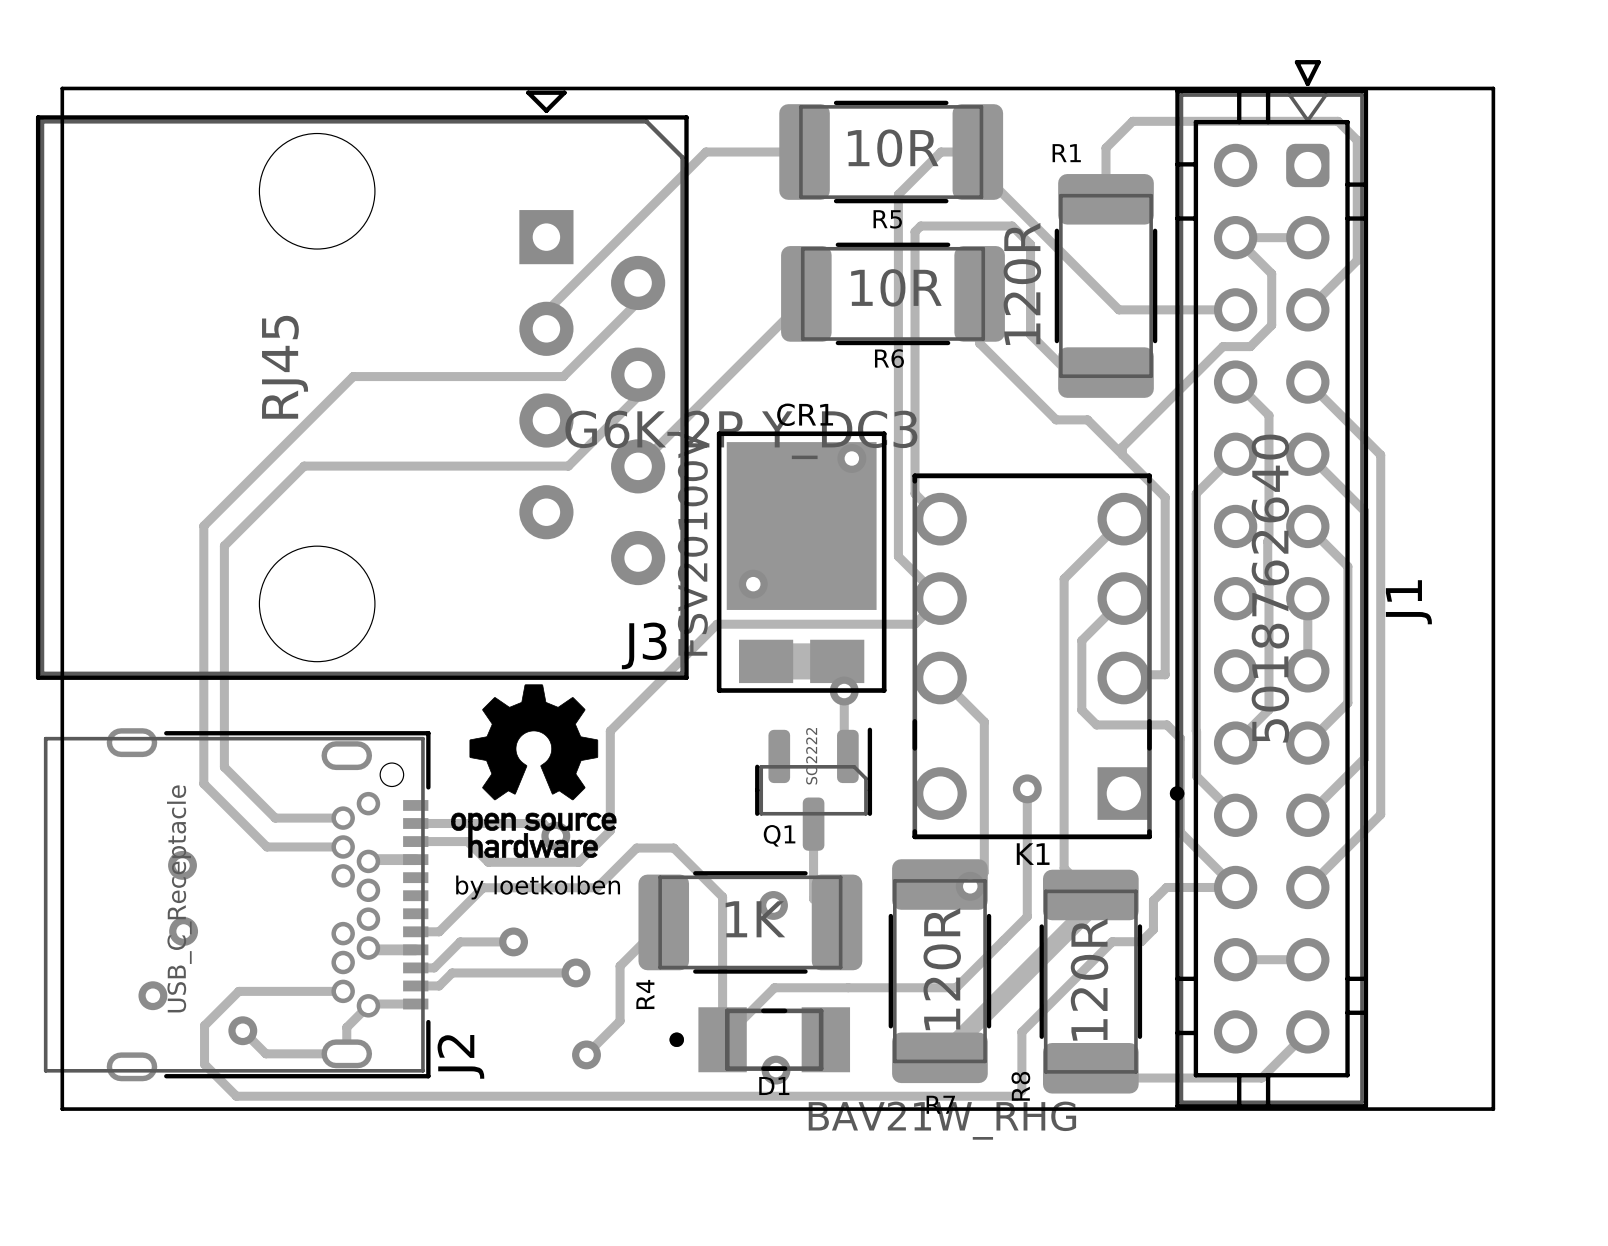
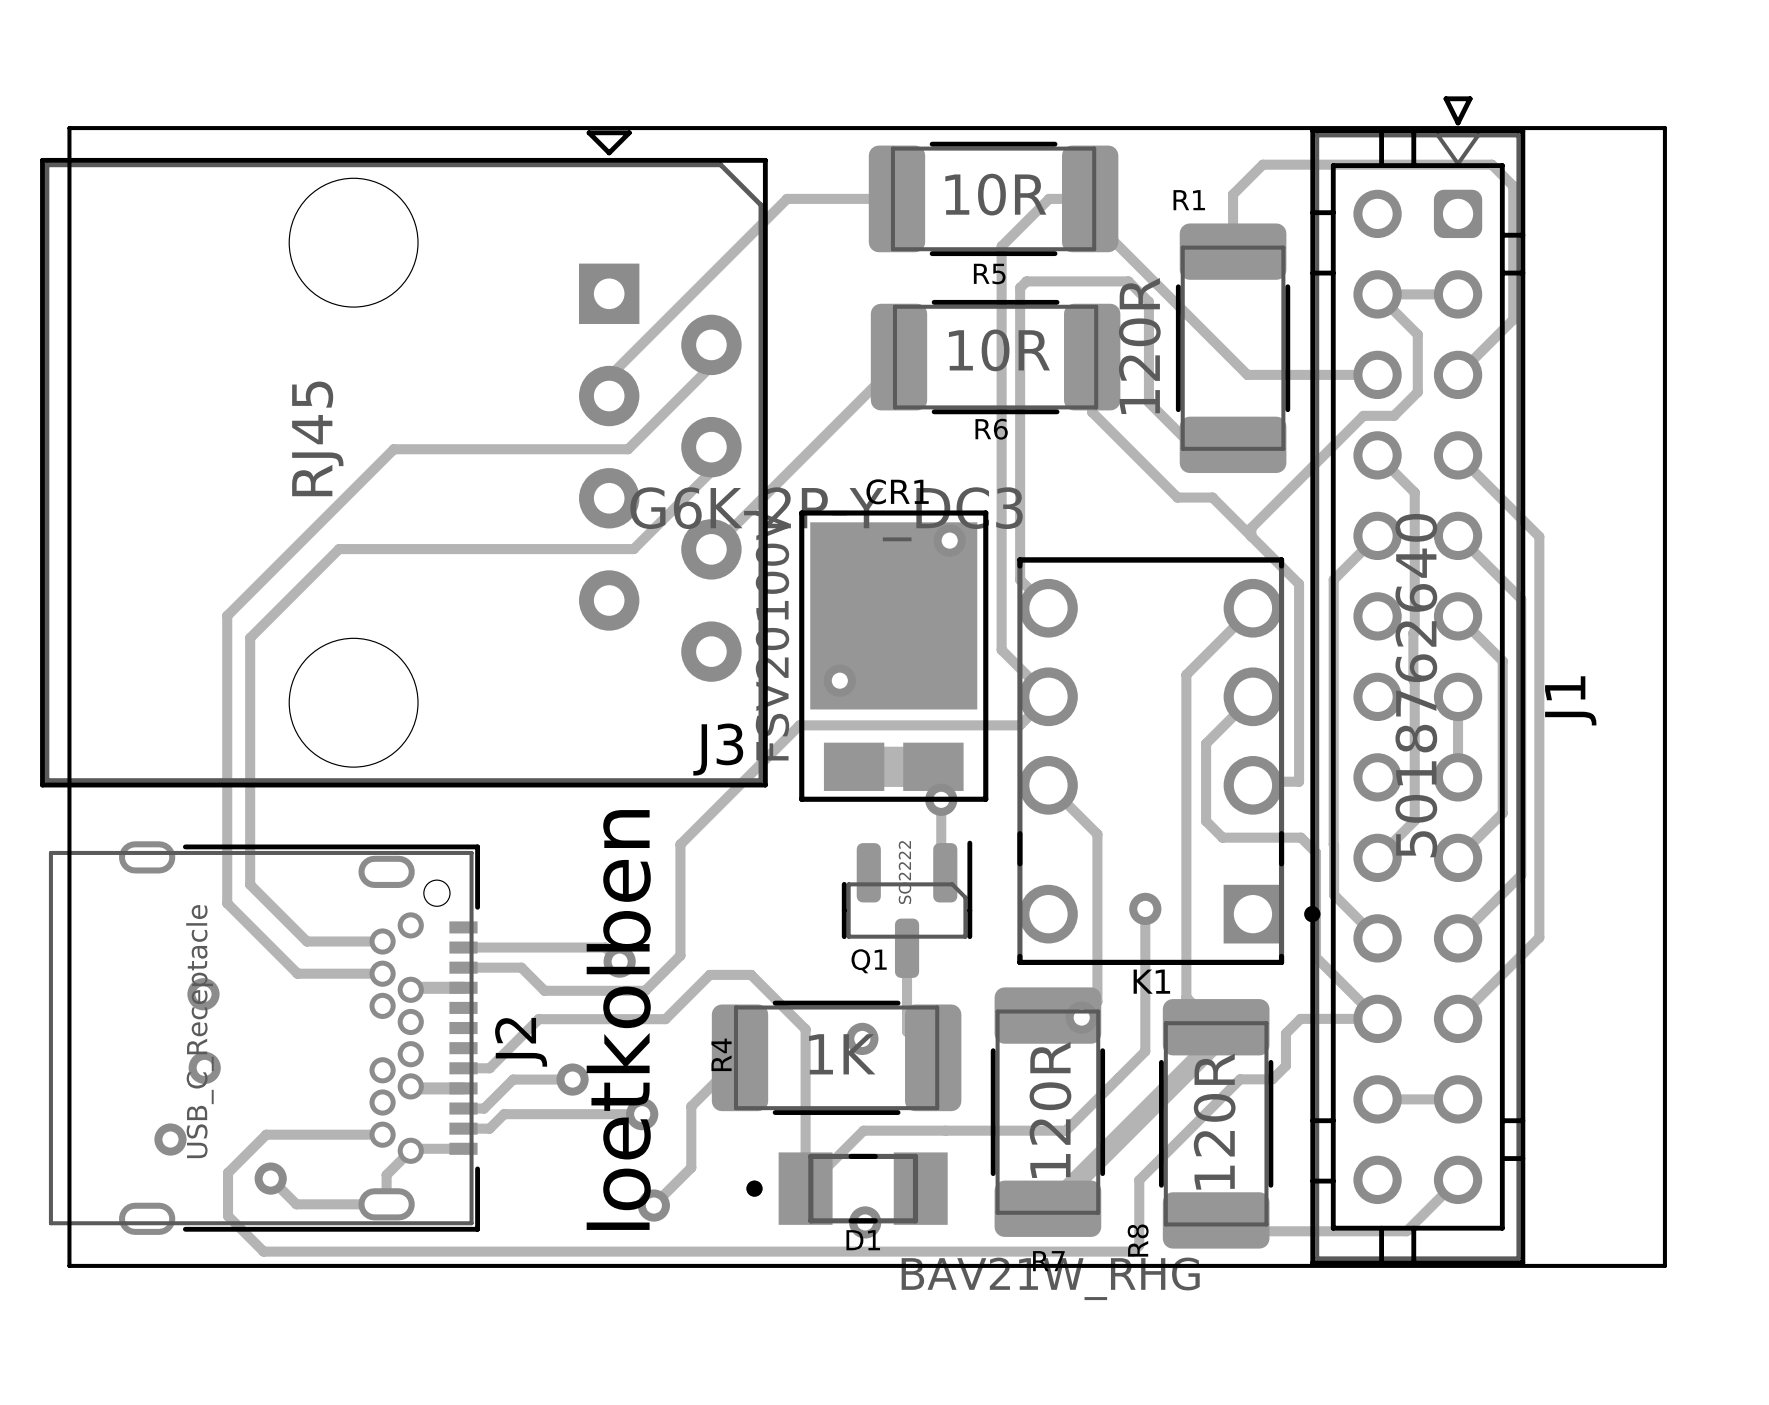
drawing: [451, 684, 617, 859] -> none
text: by loetkolben (538, 887) -> loetkolben (618, 1020)
R4 name position: R4 (645, 994) -> R4 (721, 1054)
J2 name position: J2 (460, 1056) -> J2 (521, 1042)

